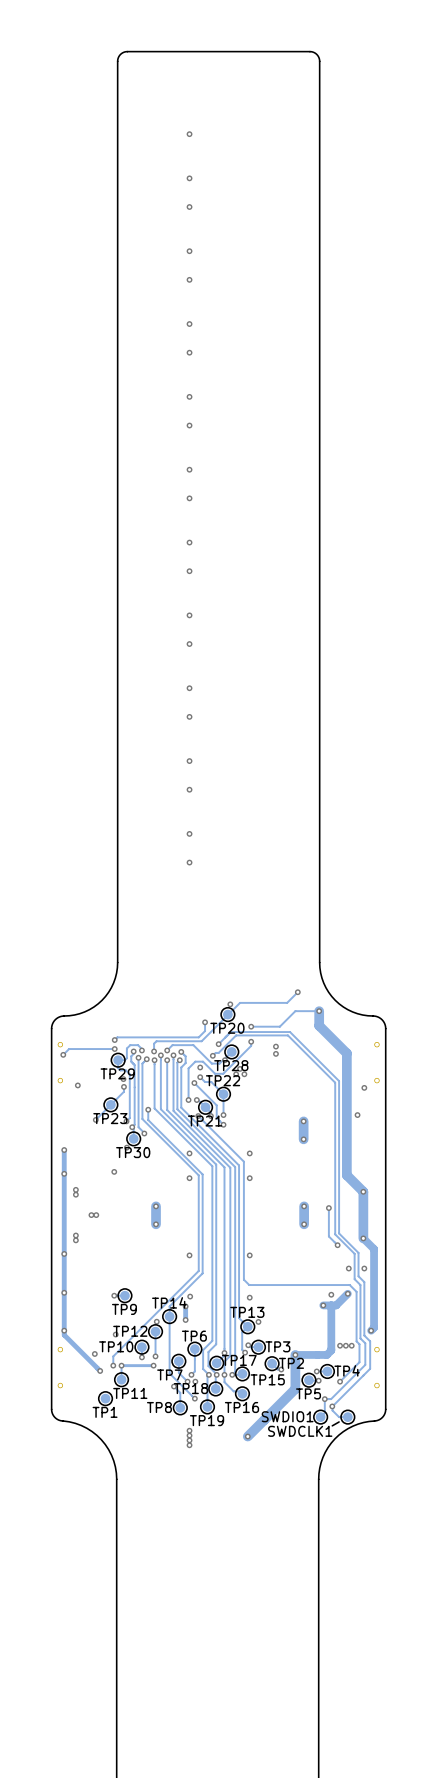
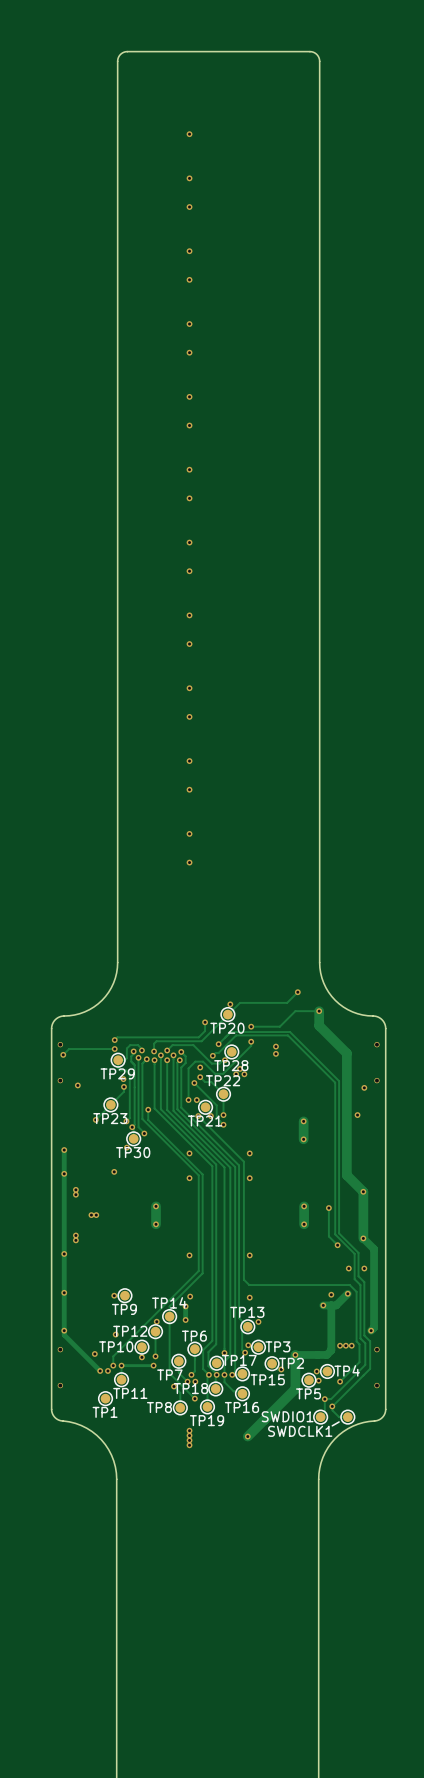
via: none -> (107, 1370)

